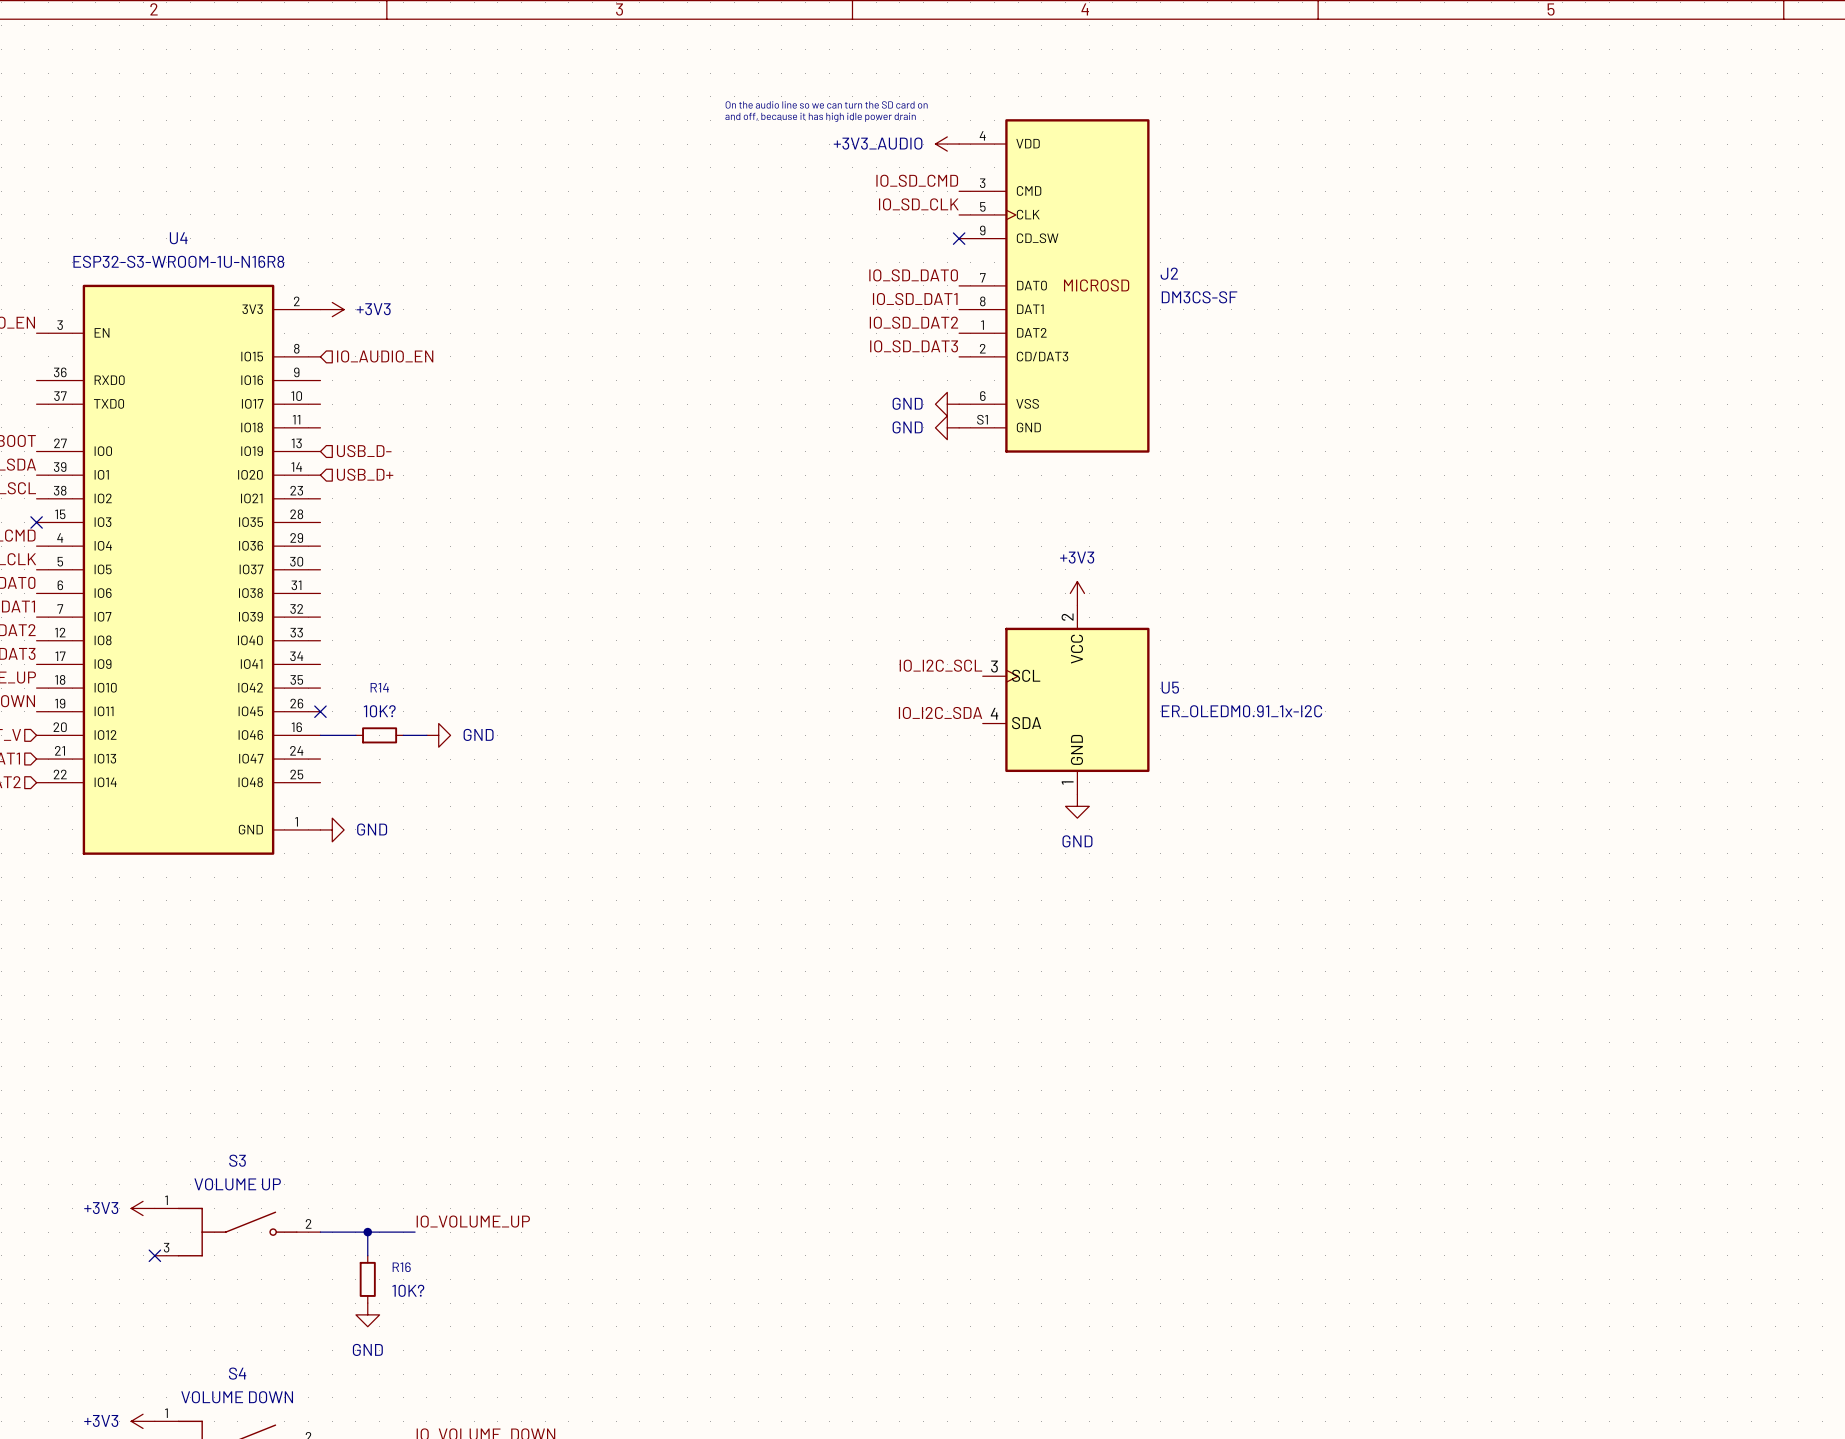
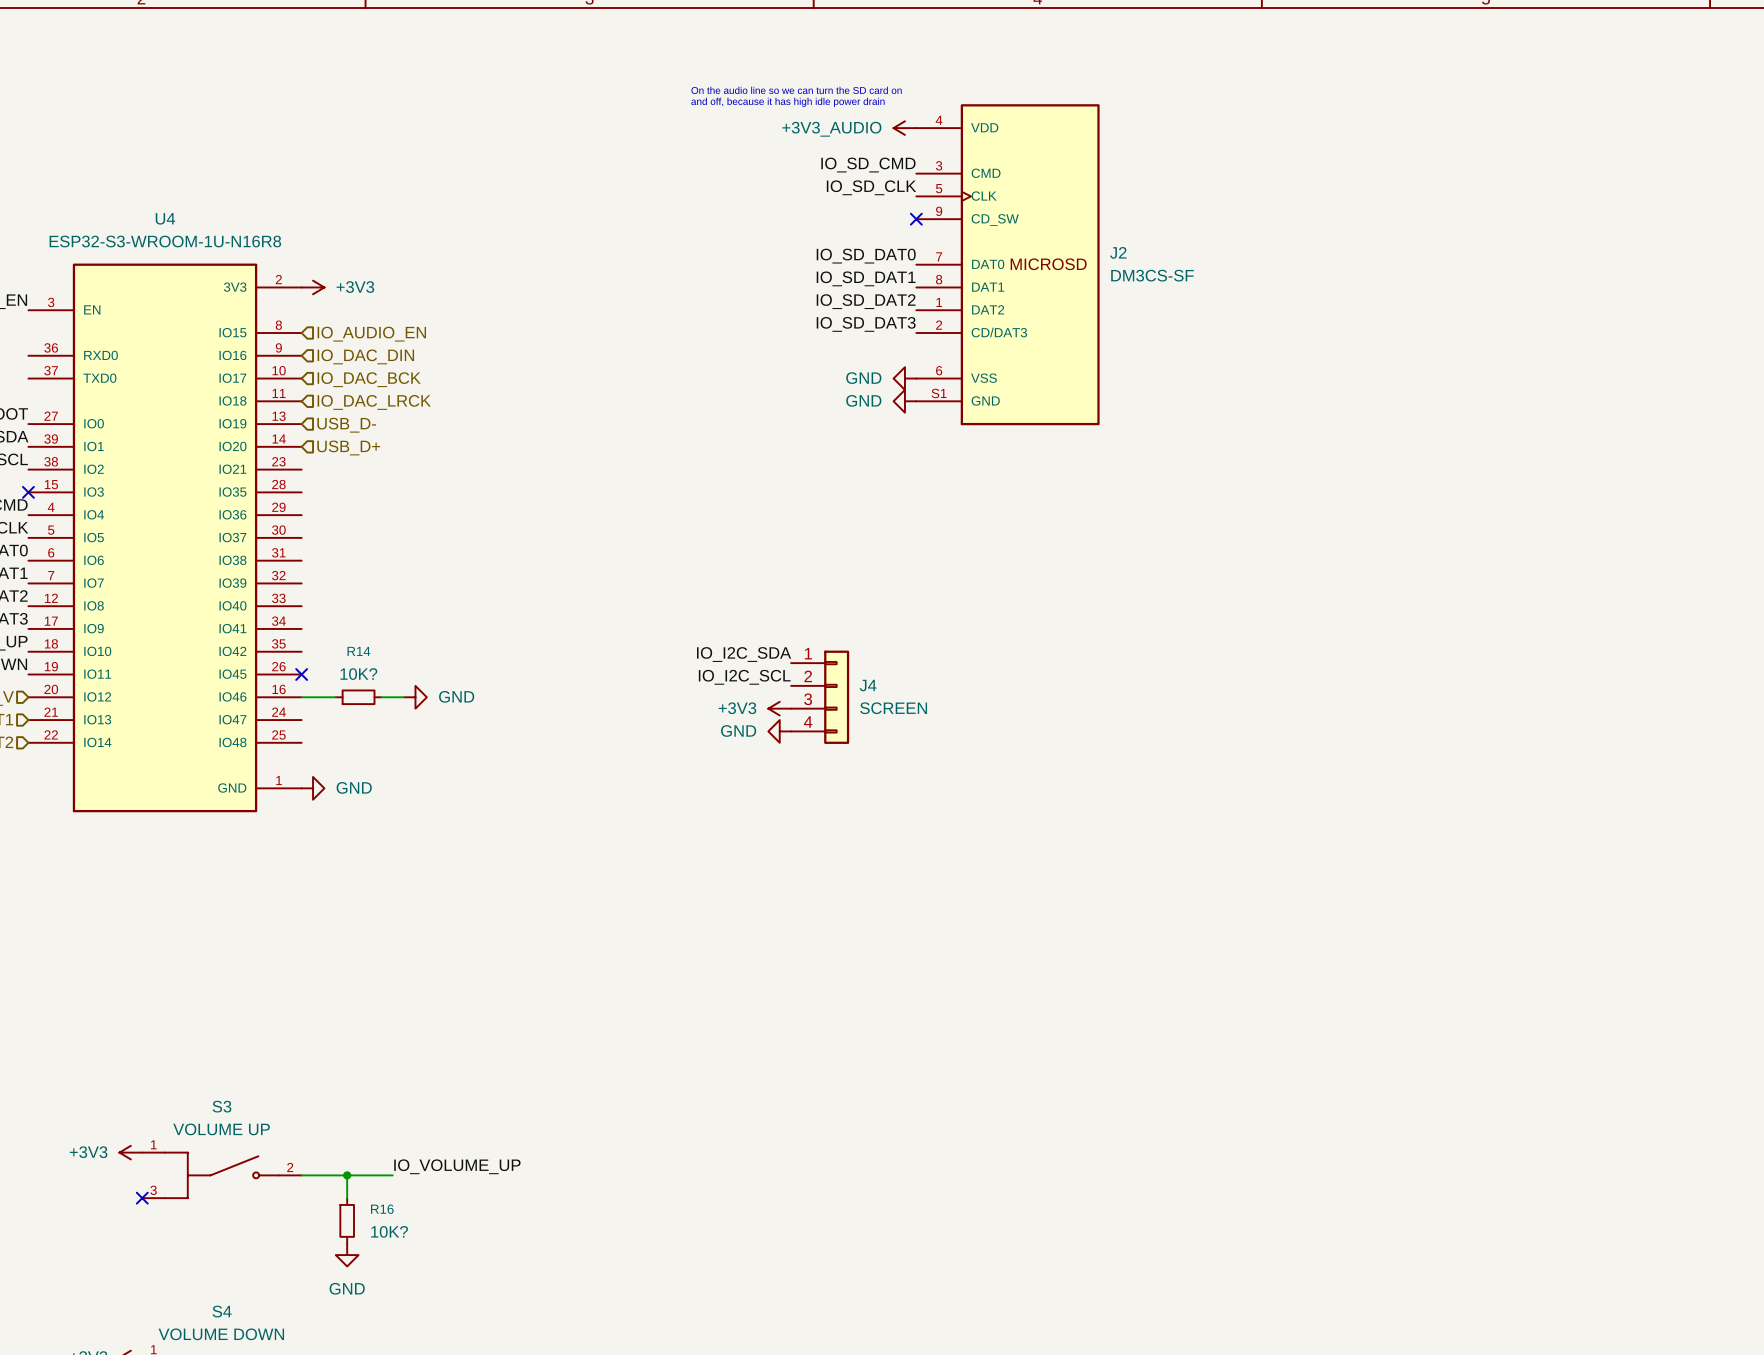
hierarchical label: none -> IO_DAC_DIN (365, 356)
hierarchical label: none -> IO_DAC_BCK (369, 379)
hierarchical label: none -> IO_DAC_LRCK (374, 402)
power symbol: +3V3 (1077, 593) -> none
label position: IO_I2C_SCL (940, 665) -> IO_I2C_SCL (744, 677)
U5: ER_OLEDM0.91_1x-I2C (1066, 699) -> none
label position: IO_I2C_SDA (940, 712) -> IO_I2C_SDA (744, 654)
J4: none -> SCREEN (820, 697)
power symbol: none -> +3V3 (779, 708)
power symbol: none -> GND (779, 731)
power symbol: GND (1077, 806) -> none

